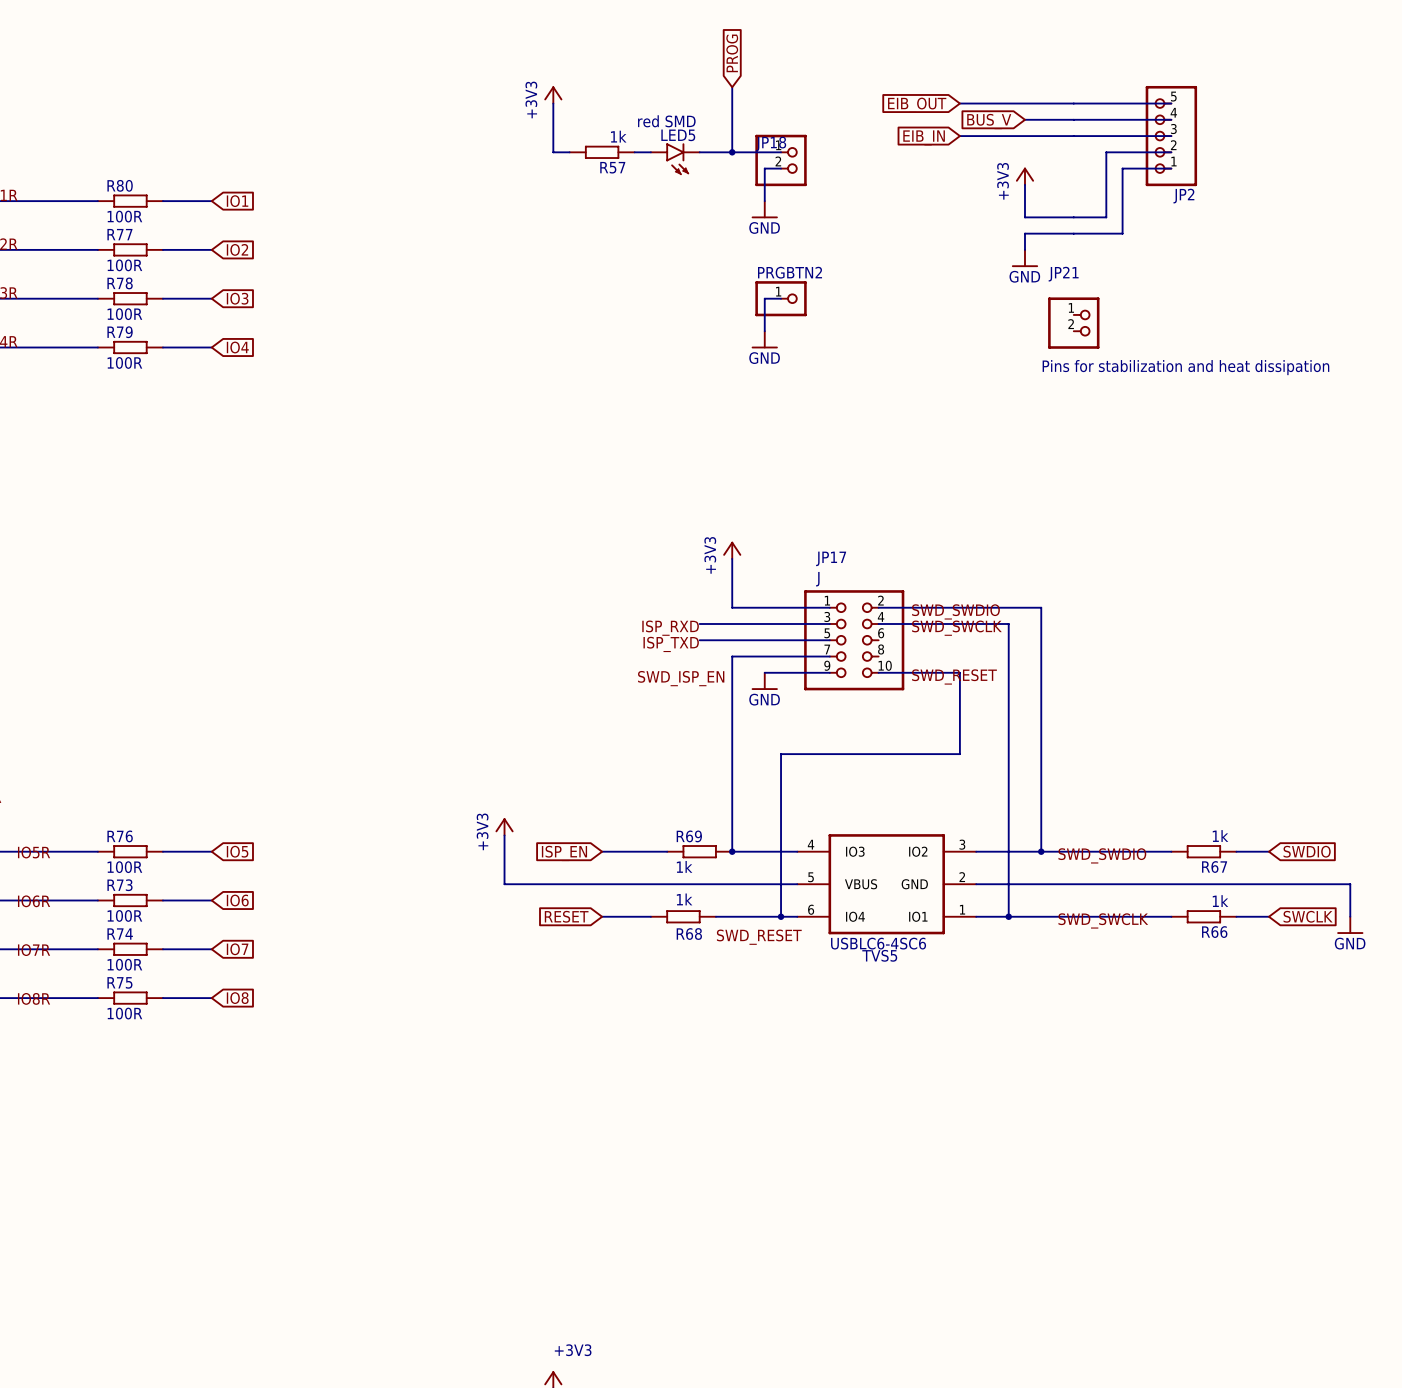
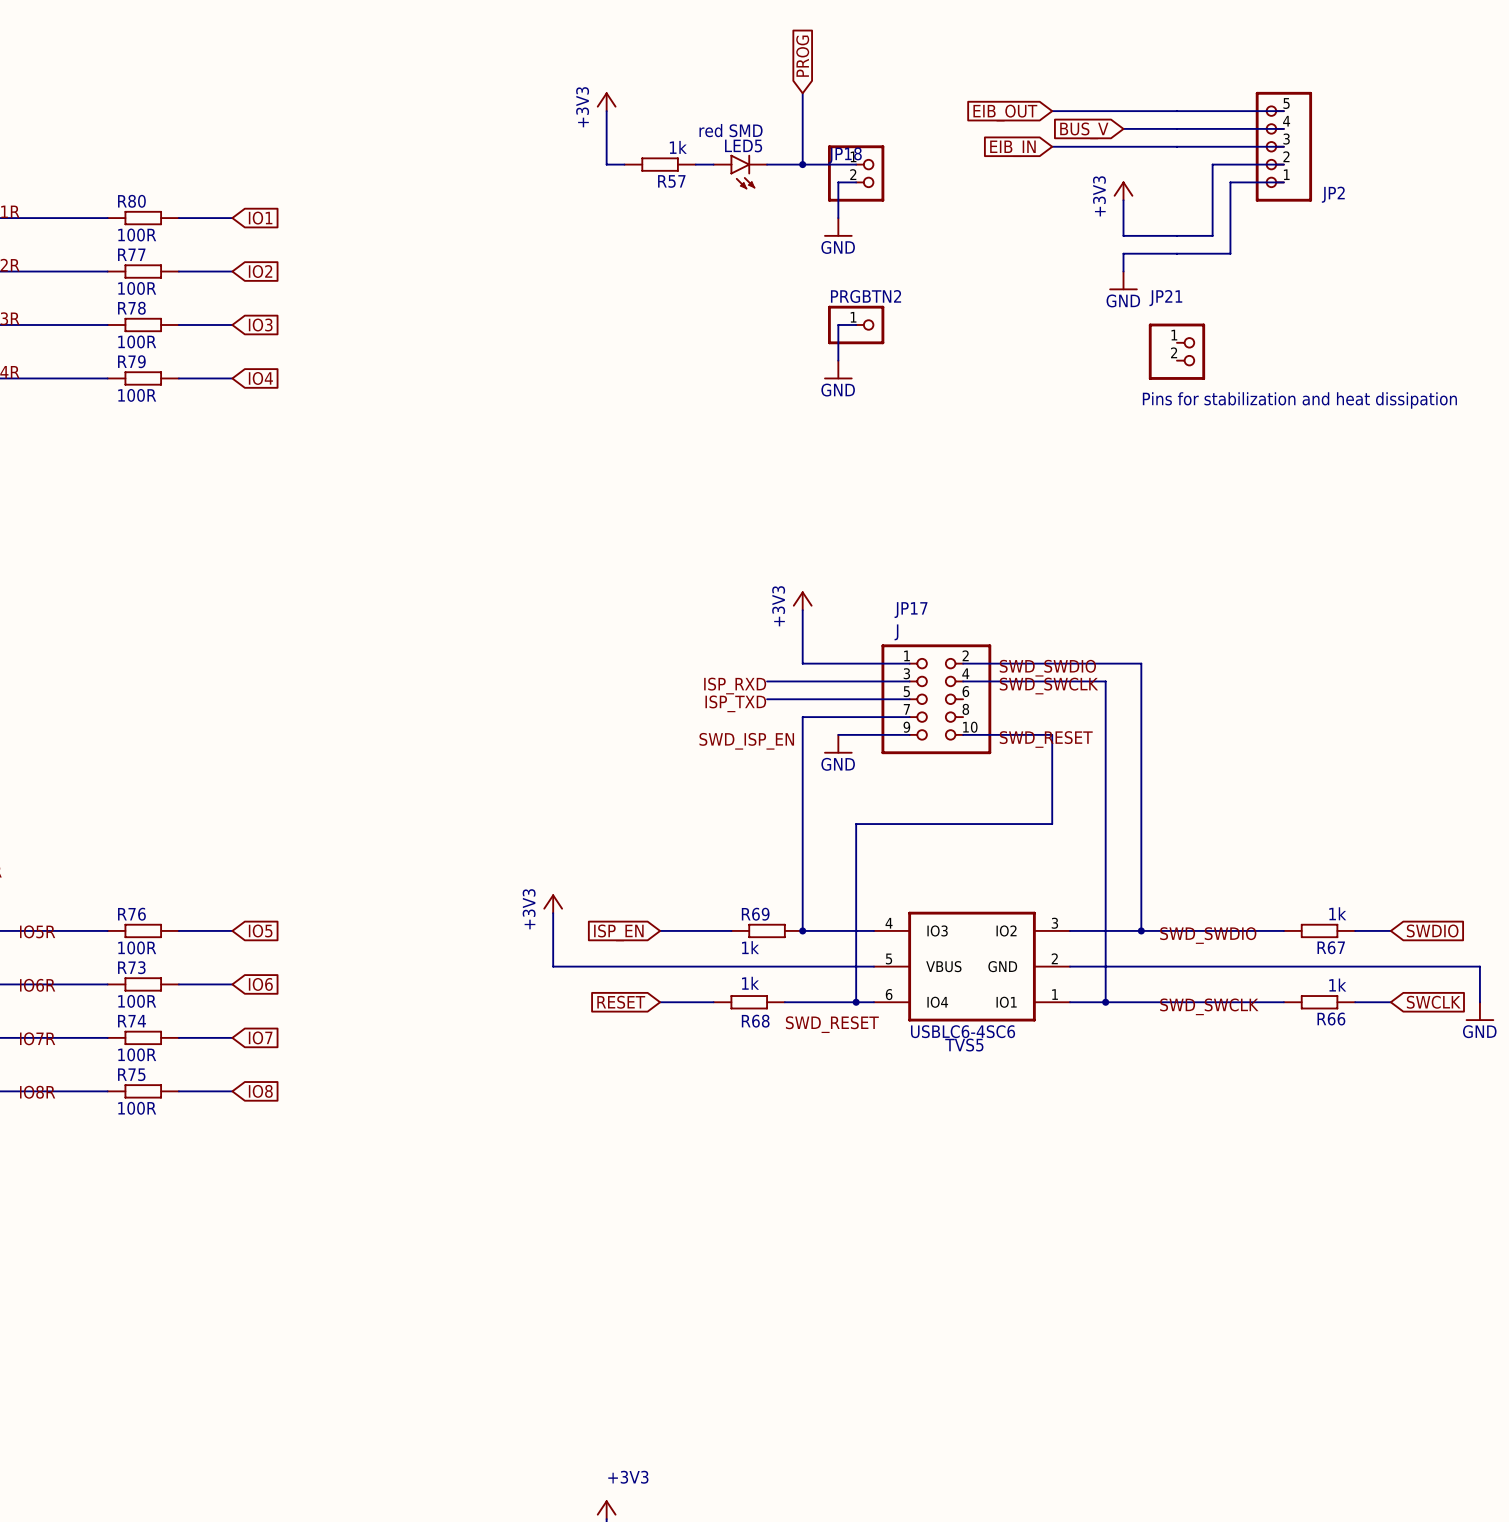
JP2 name position: JP2 (1183, 196) -> JP2 (1333, 194)

